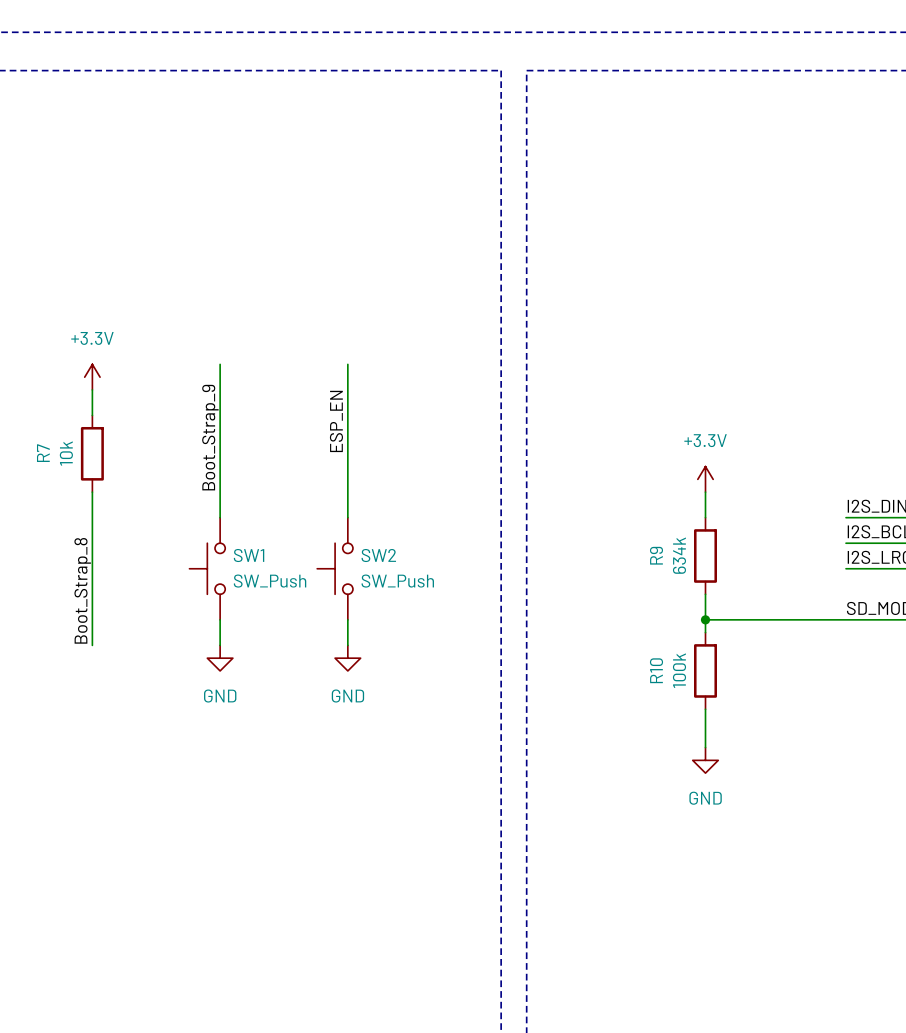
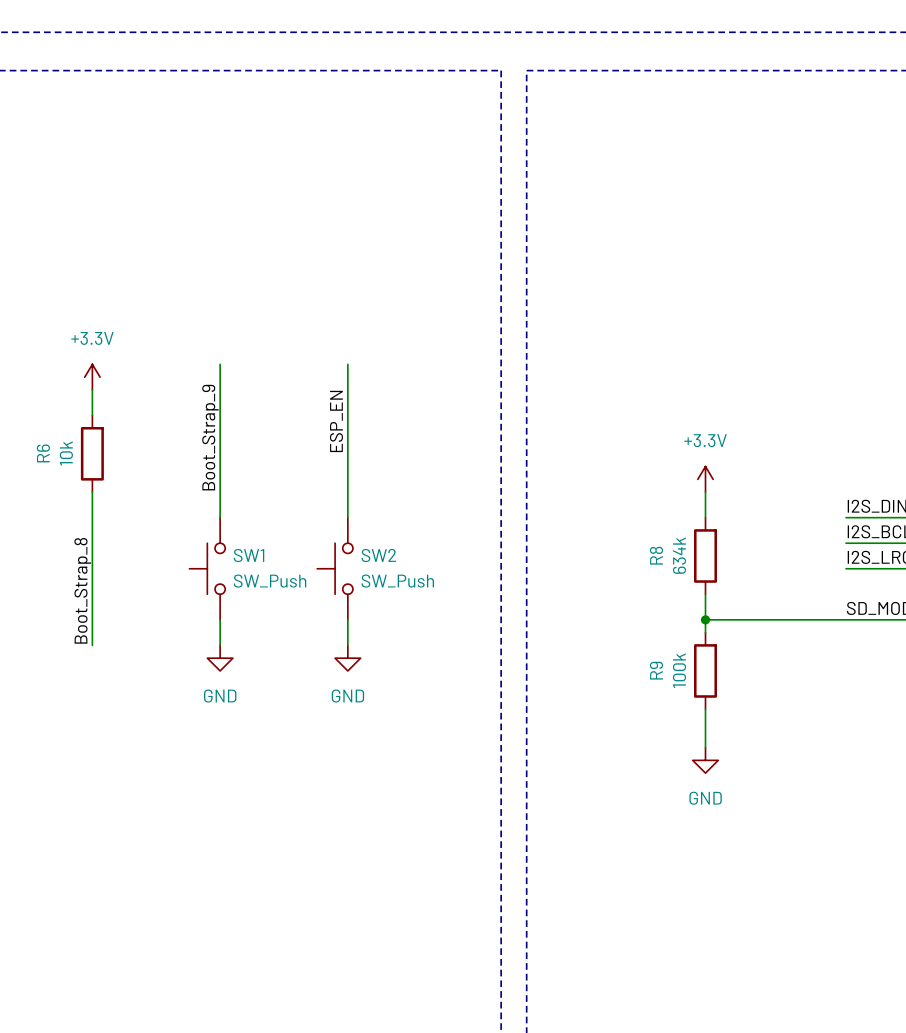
R7 name: R7 (43, 453) -> R6 (43, 453)
R9 name: R9 (656, 555) -> R8 (656, 555)
R10 name: R10 (656, 670) -> R9 (656, 670)

